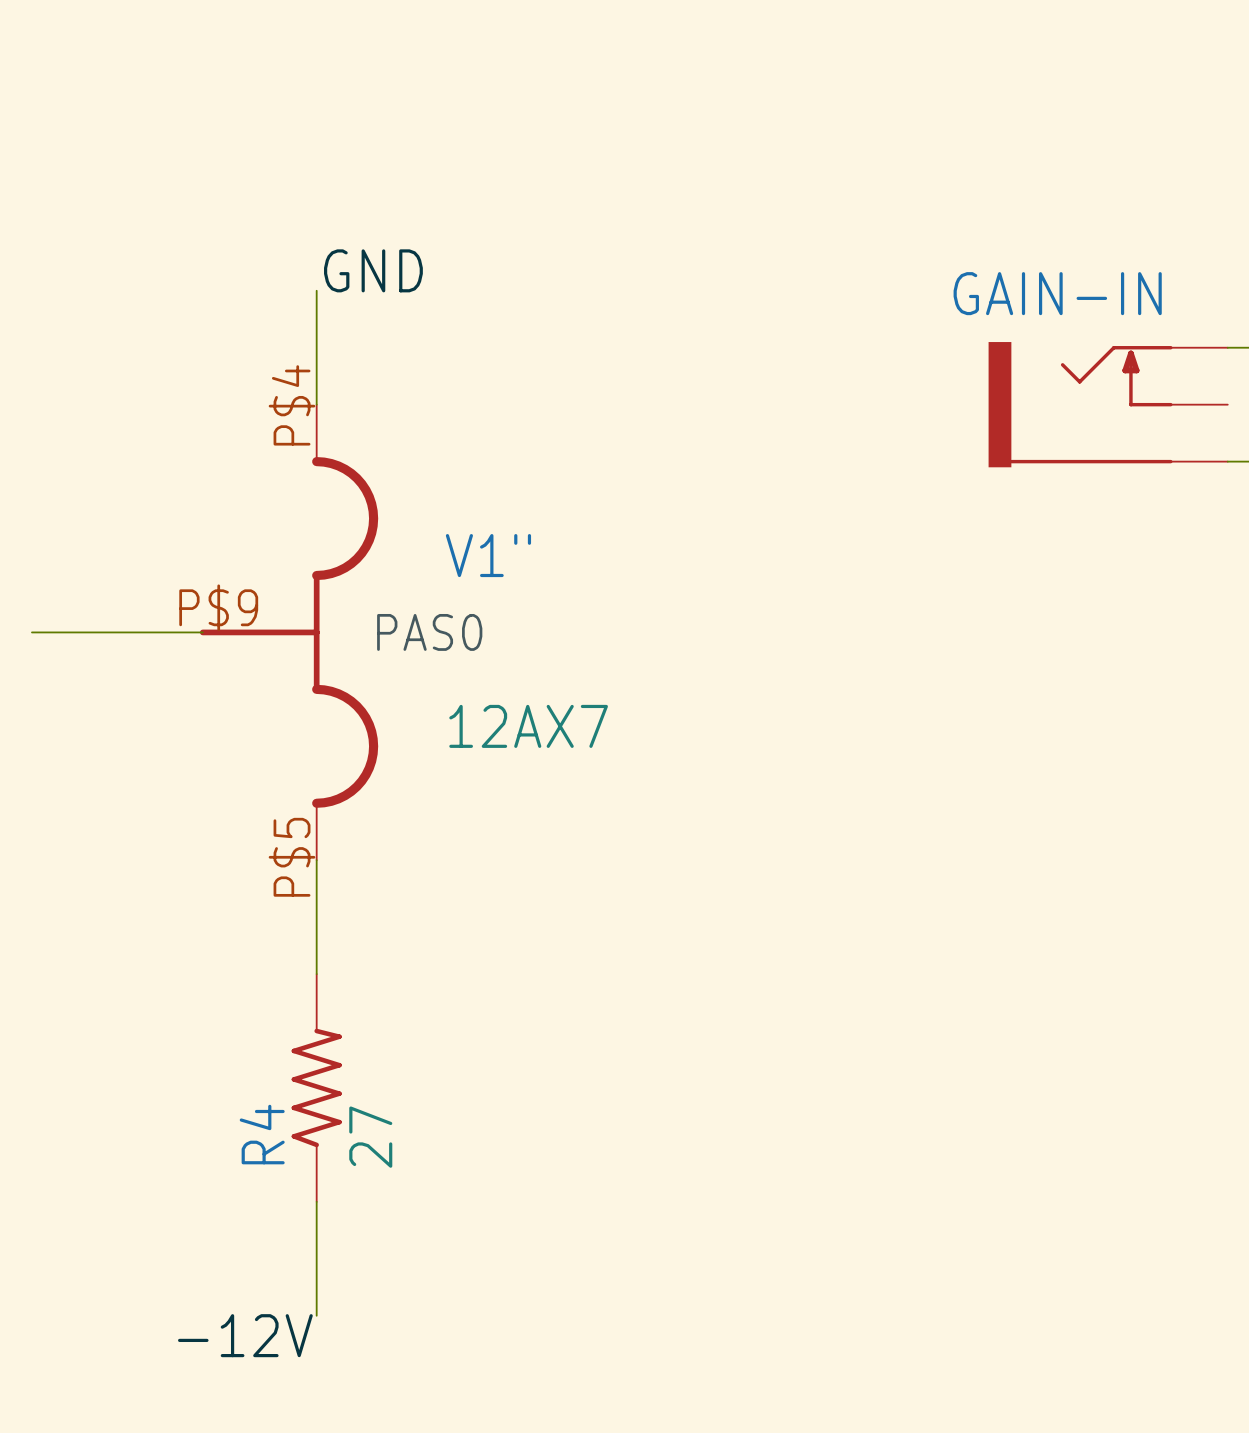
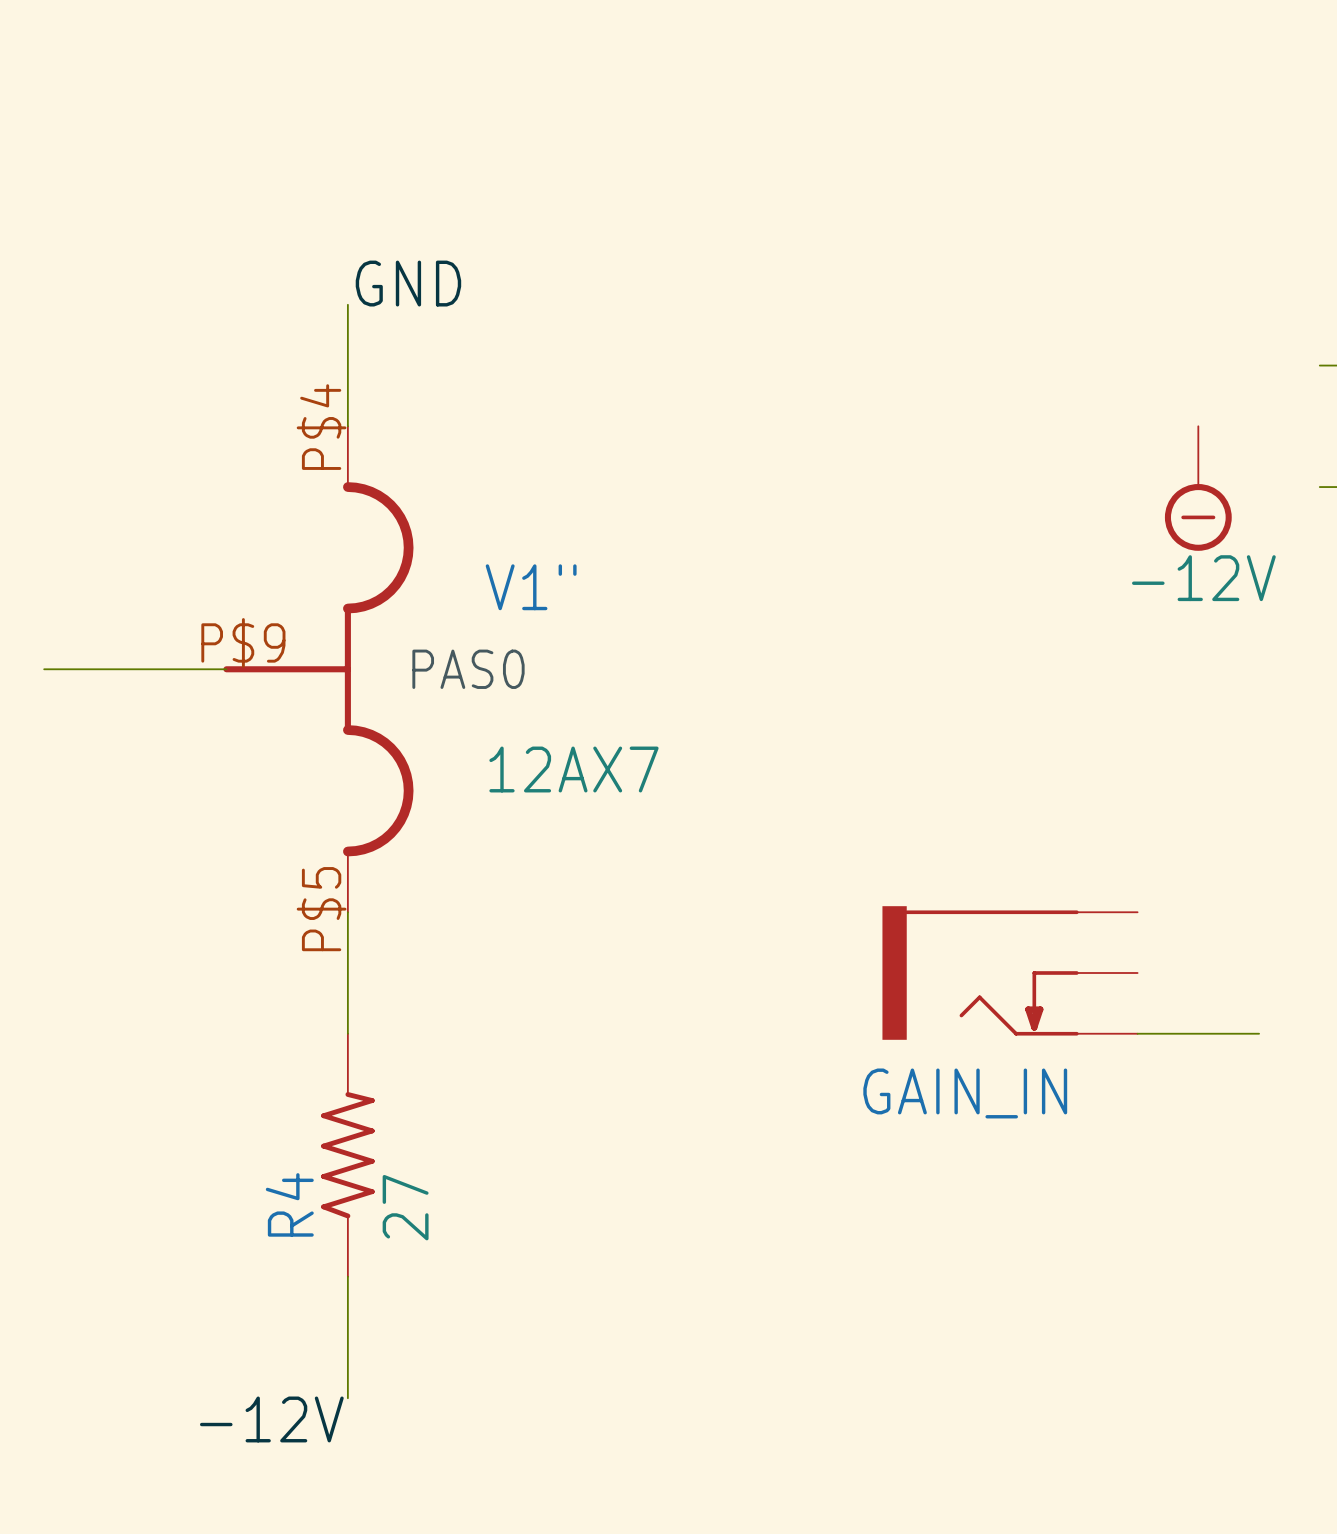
GAIN-IN: (1108, 404) -> none
power symbol: none -> -12V (1198, 488)
GAIN_IN: none -> (1010, 972)
wire: none -> (1137, 1033) (1259, 1033)

